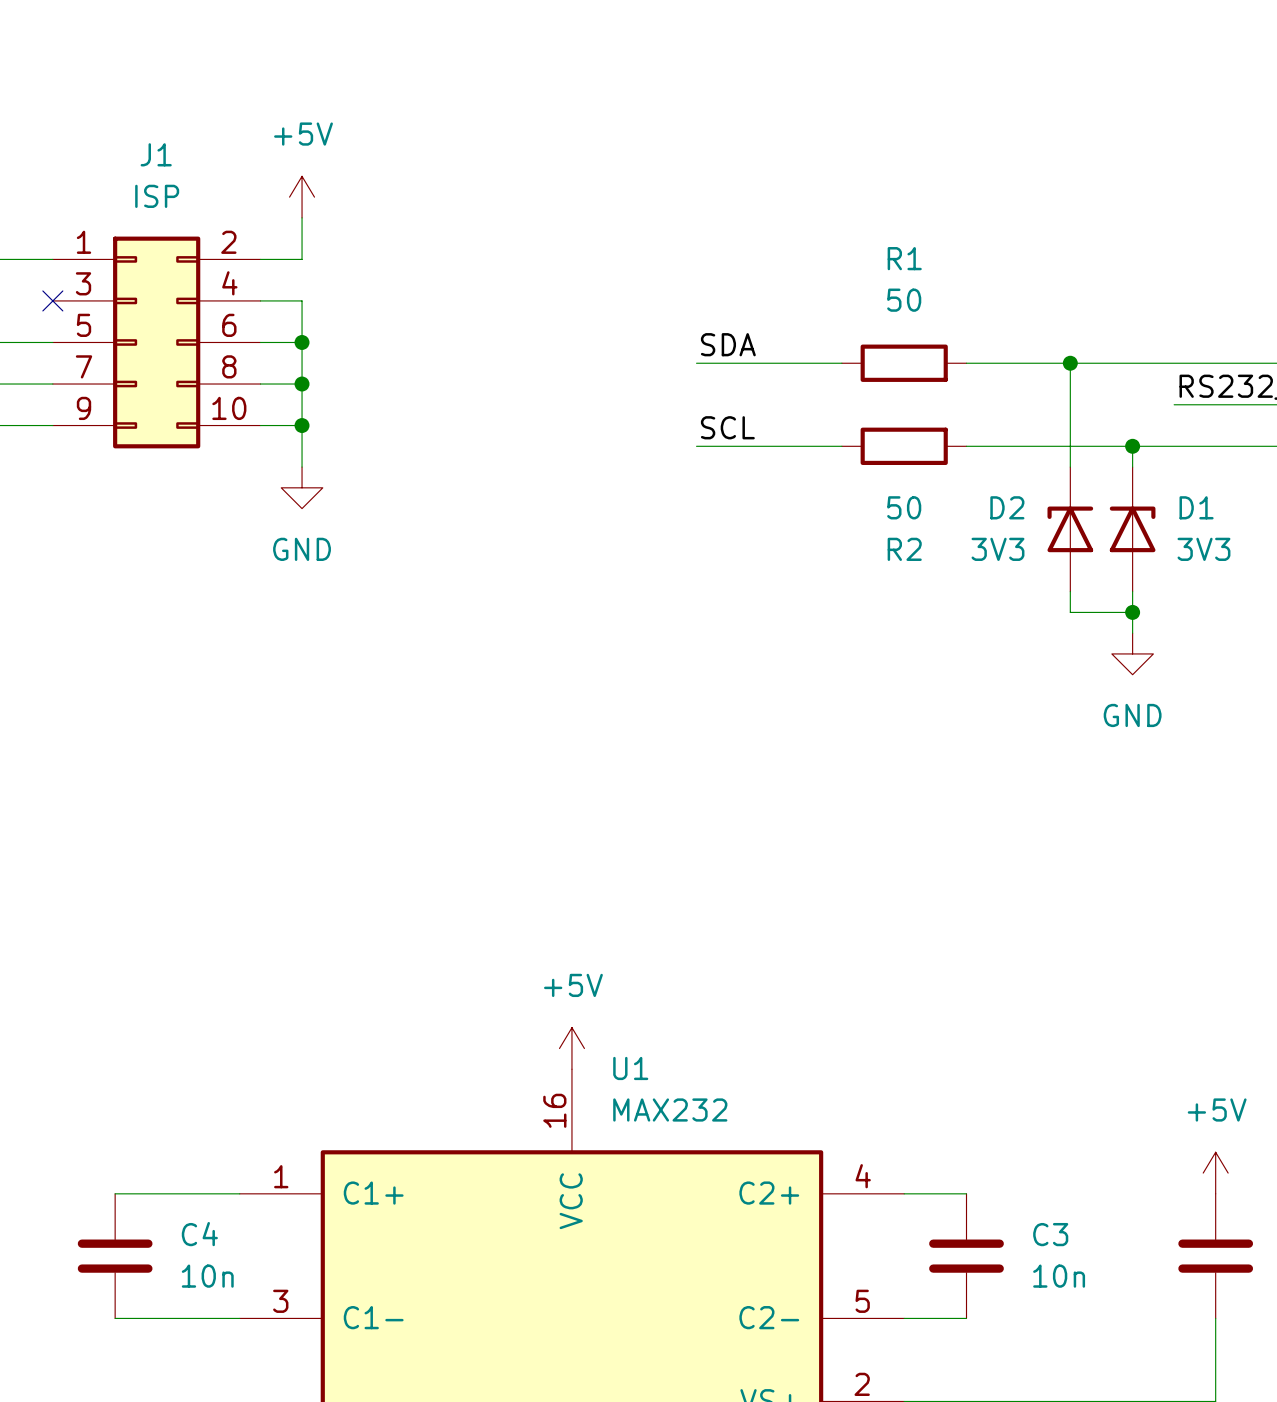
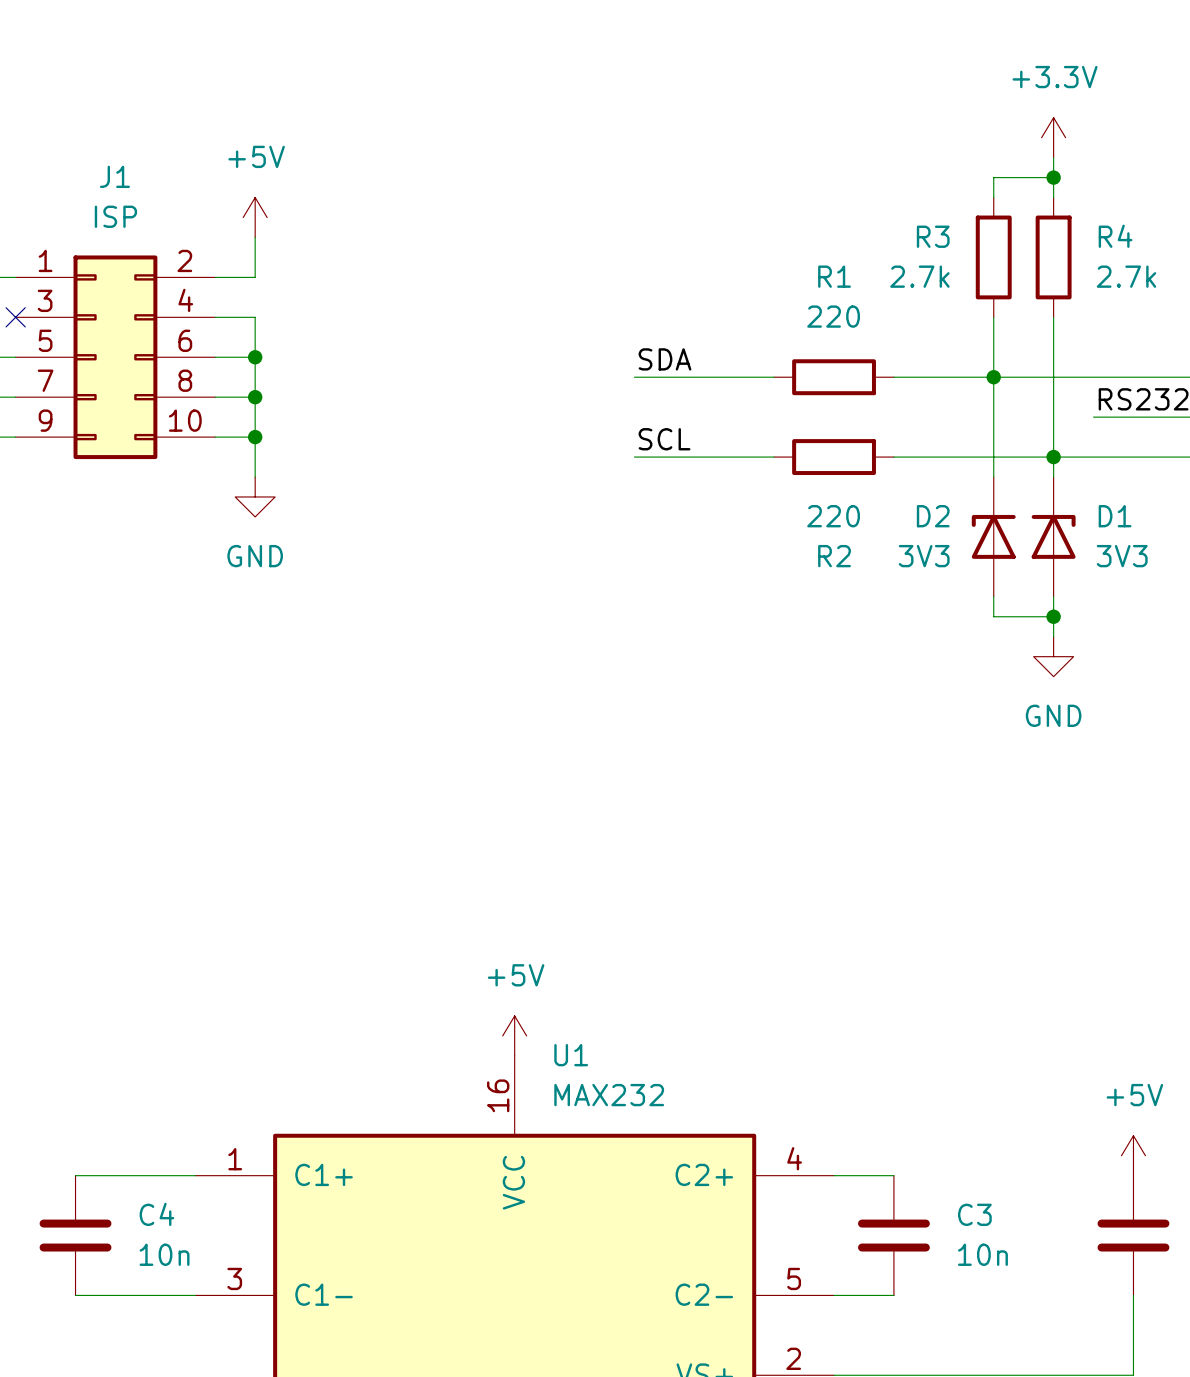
power symbol: none -> +3.3V (1053, 137)
wire: none -> (1053, 157) (1053, 197)
wire: none -> (1053, 177) (993, 177) (993, 197)
junction: none -> (1053, 177)
R3: none -> 2.7k (993, 257)
R4: none -> 2.7k (1053, 257)
R1 value: 50 (904, 300) -> 220 (833, 316)
wire: none -> (993, 317) (993, 377)
wire: none -> (1053, 317) (1053, 457)
R2 value: 50 (904, 507) -> 220 (833, 516)

